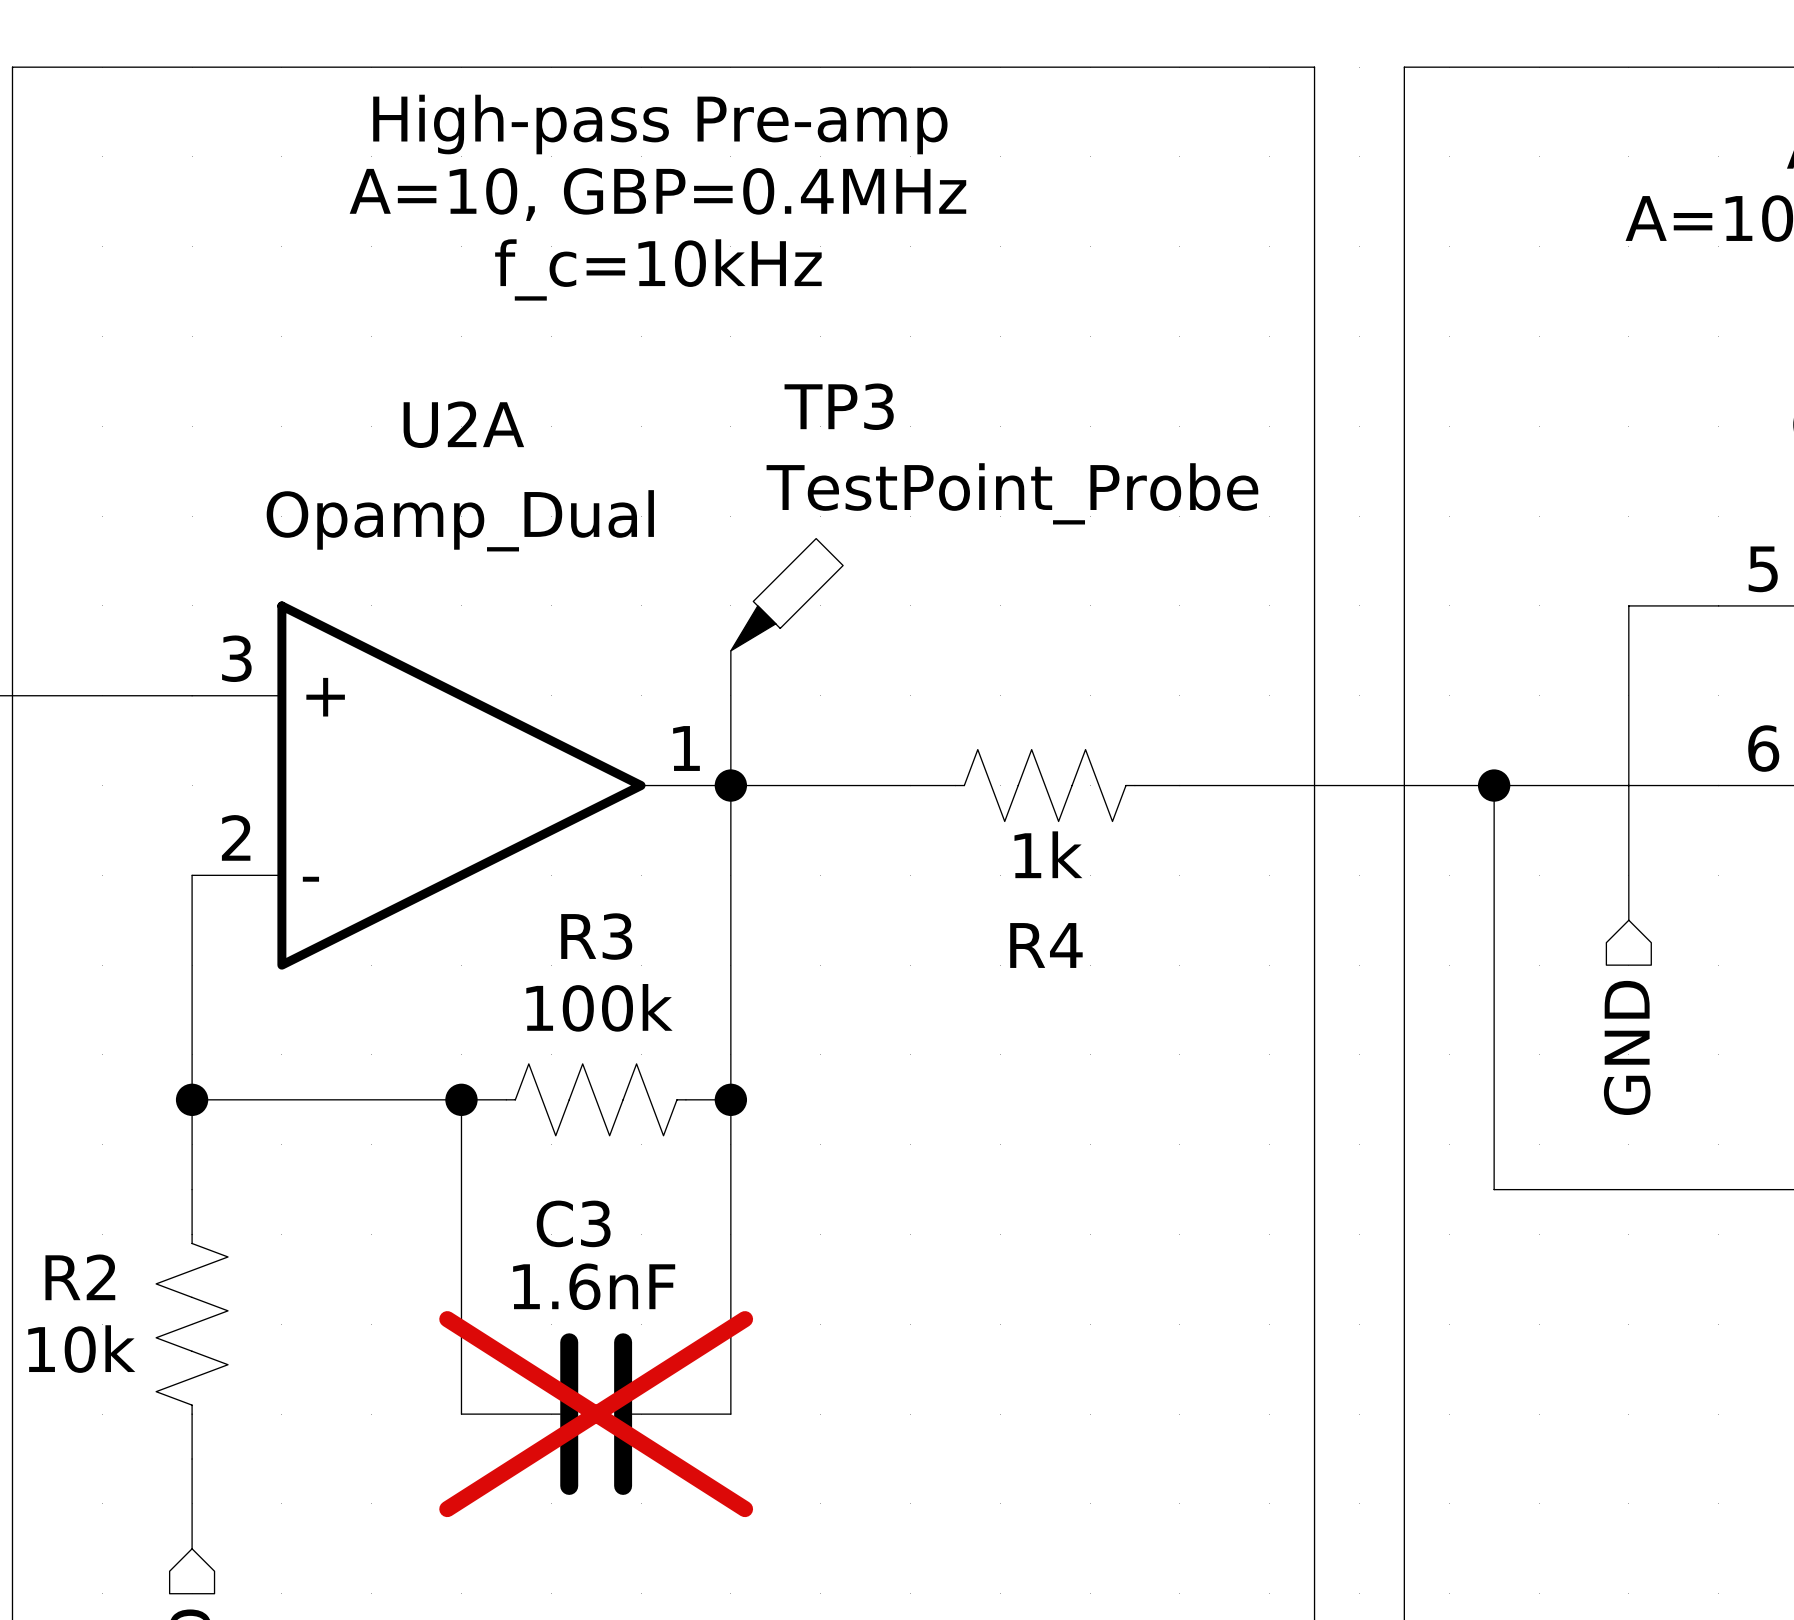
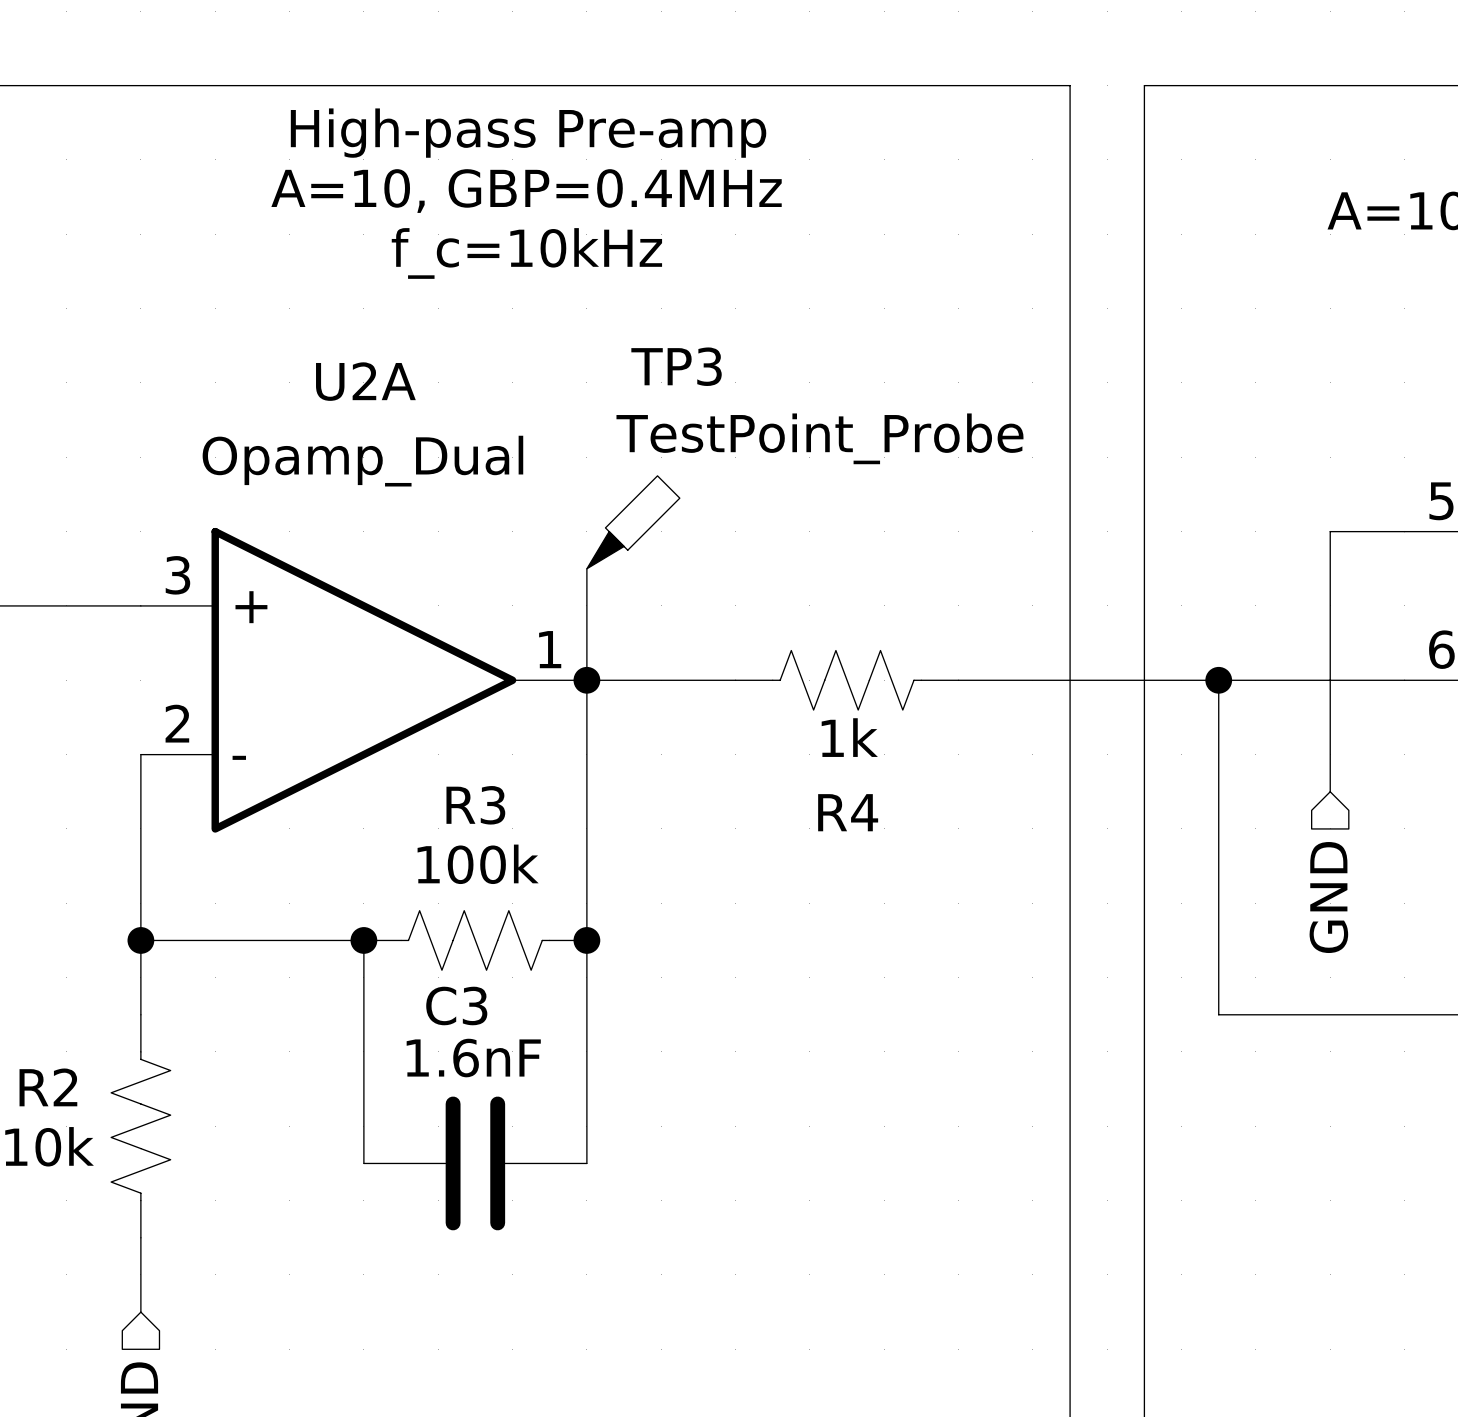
wire: (461, 1369) (461, 1414) -> none
wire: (730, 1369) (730, 1414) -> none
C3 position: (596, 1414) -> (475, 1163)
C3 do-not-place cross: (596, 1414) -> none

